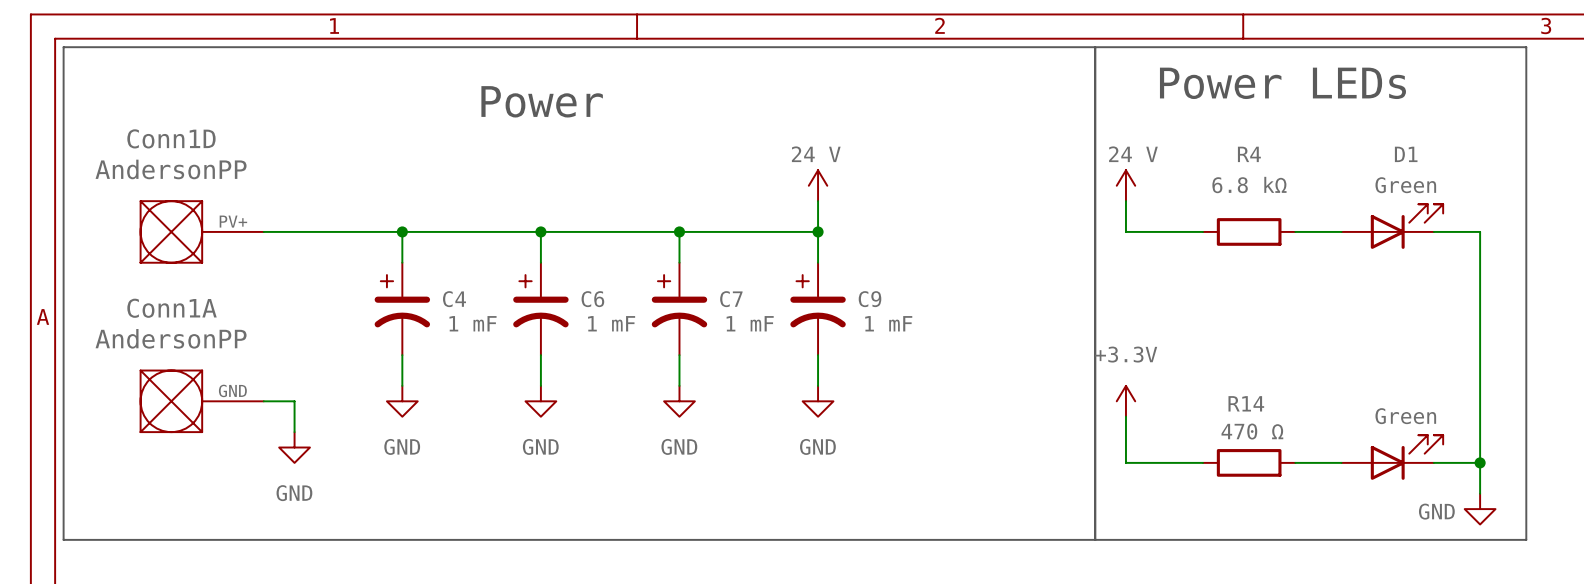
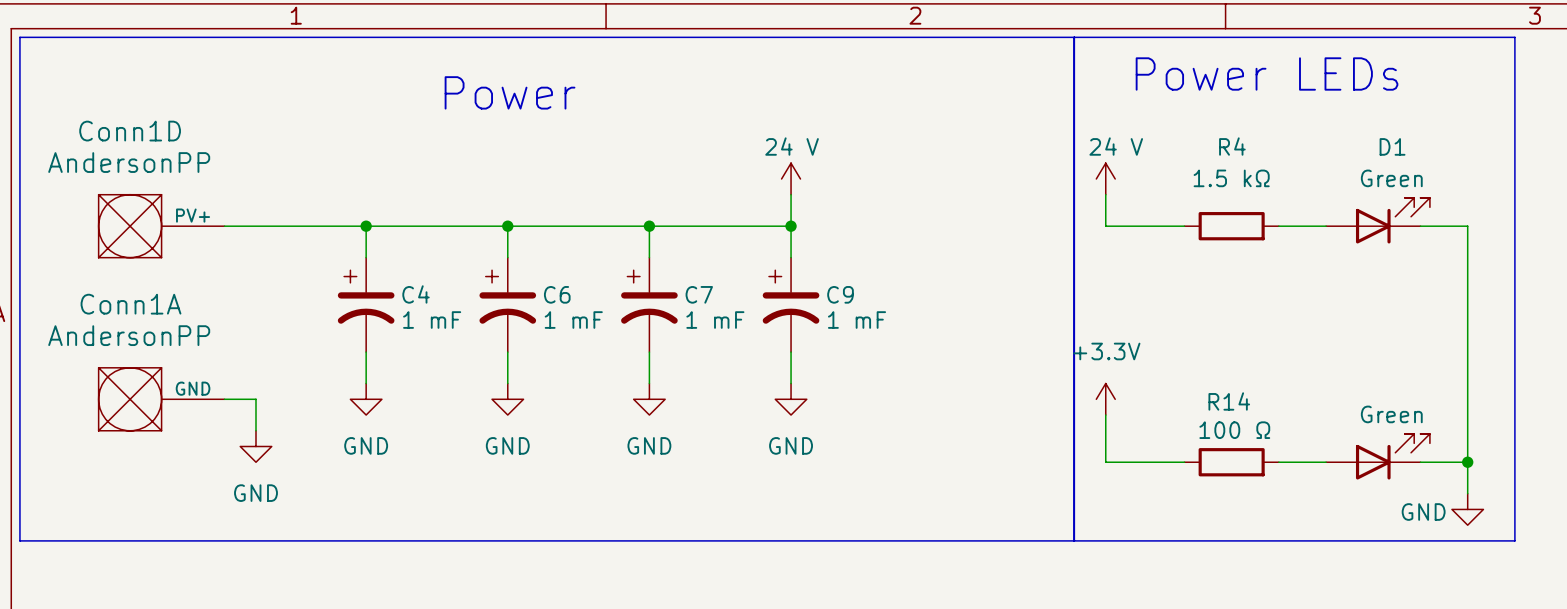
R4 value: 6.8 kΩ (1249, 185) -> 1.5 kΩ (1231, 178)
R14 value: 470 Ω (1252, 431) -> 100 Ω (1234, 430)

